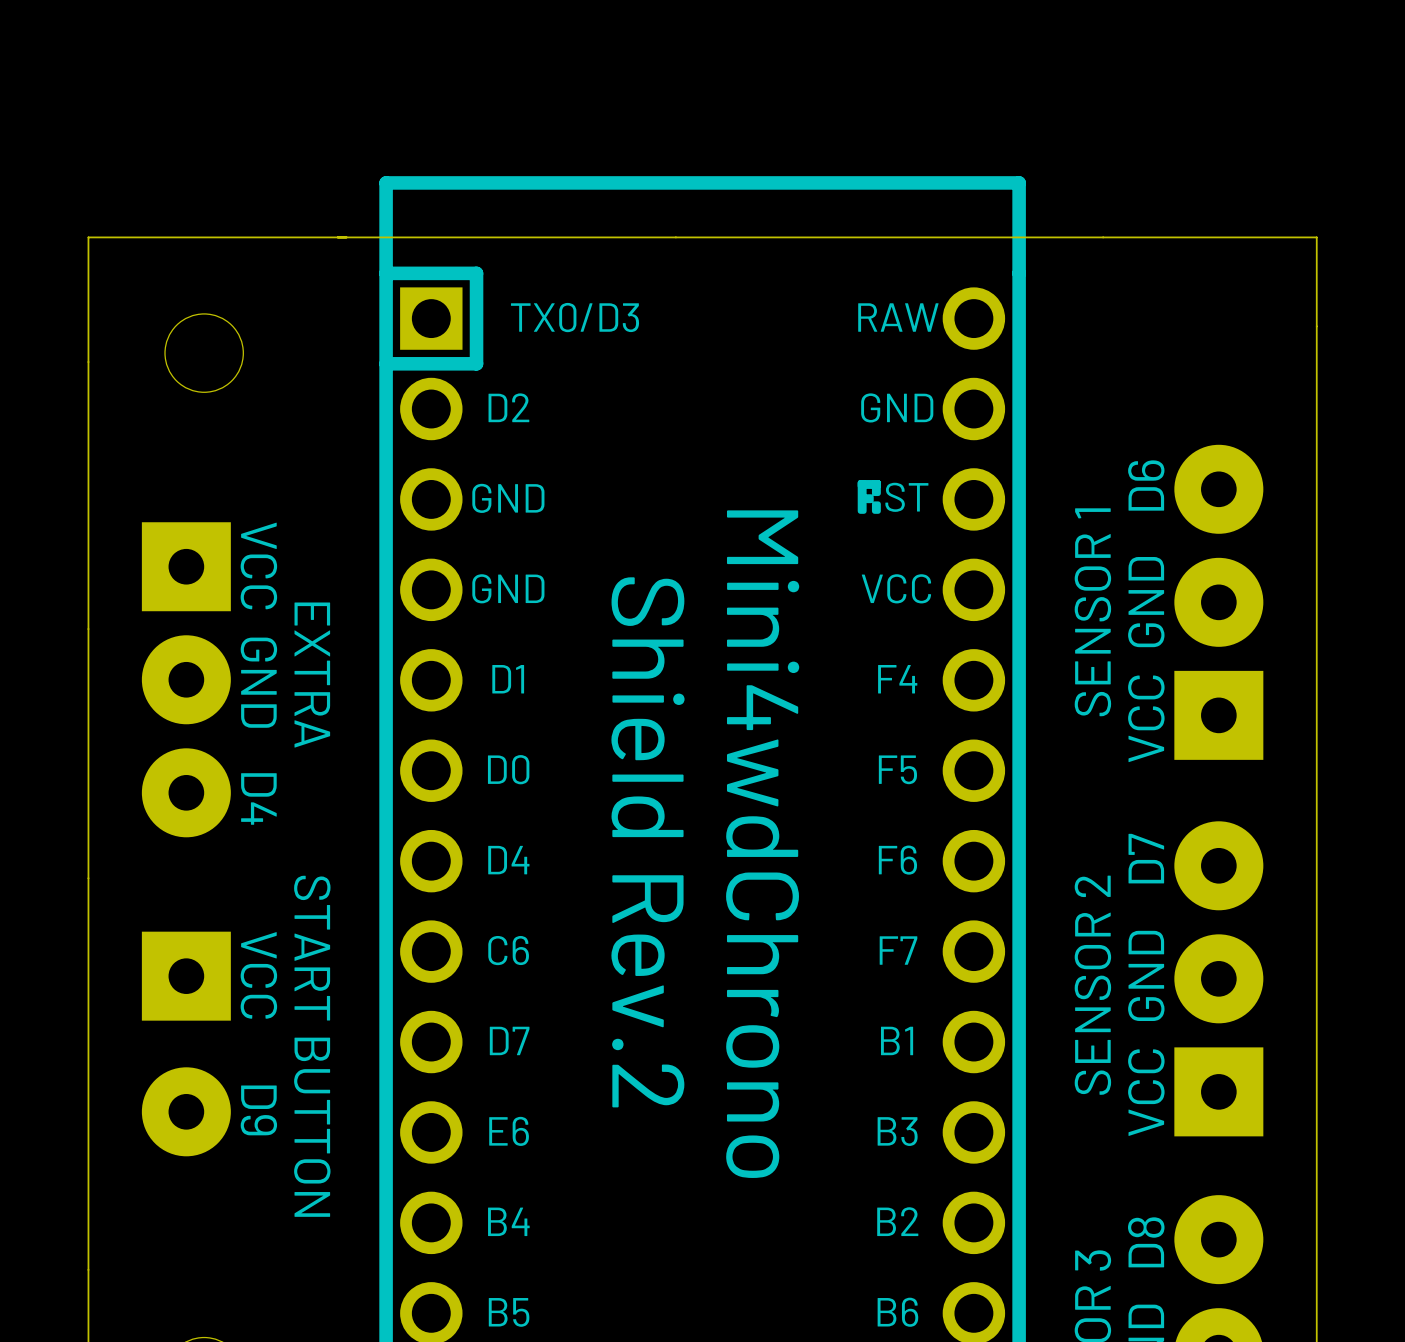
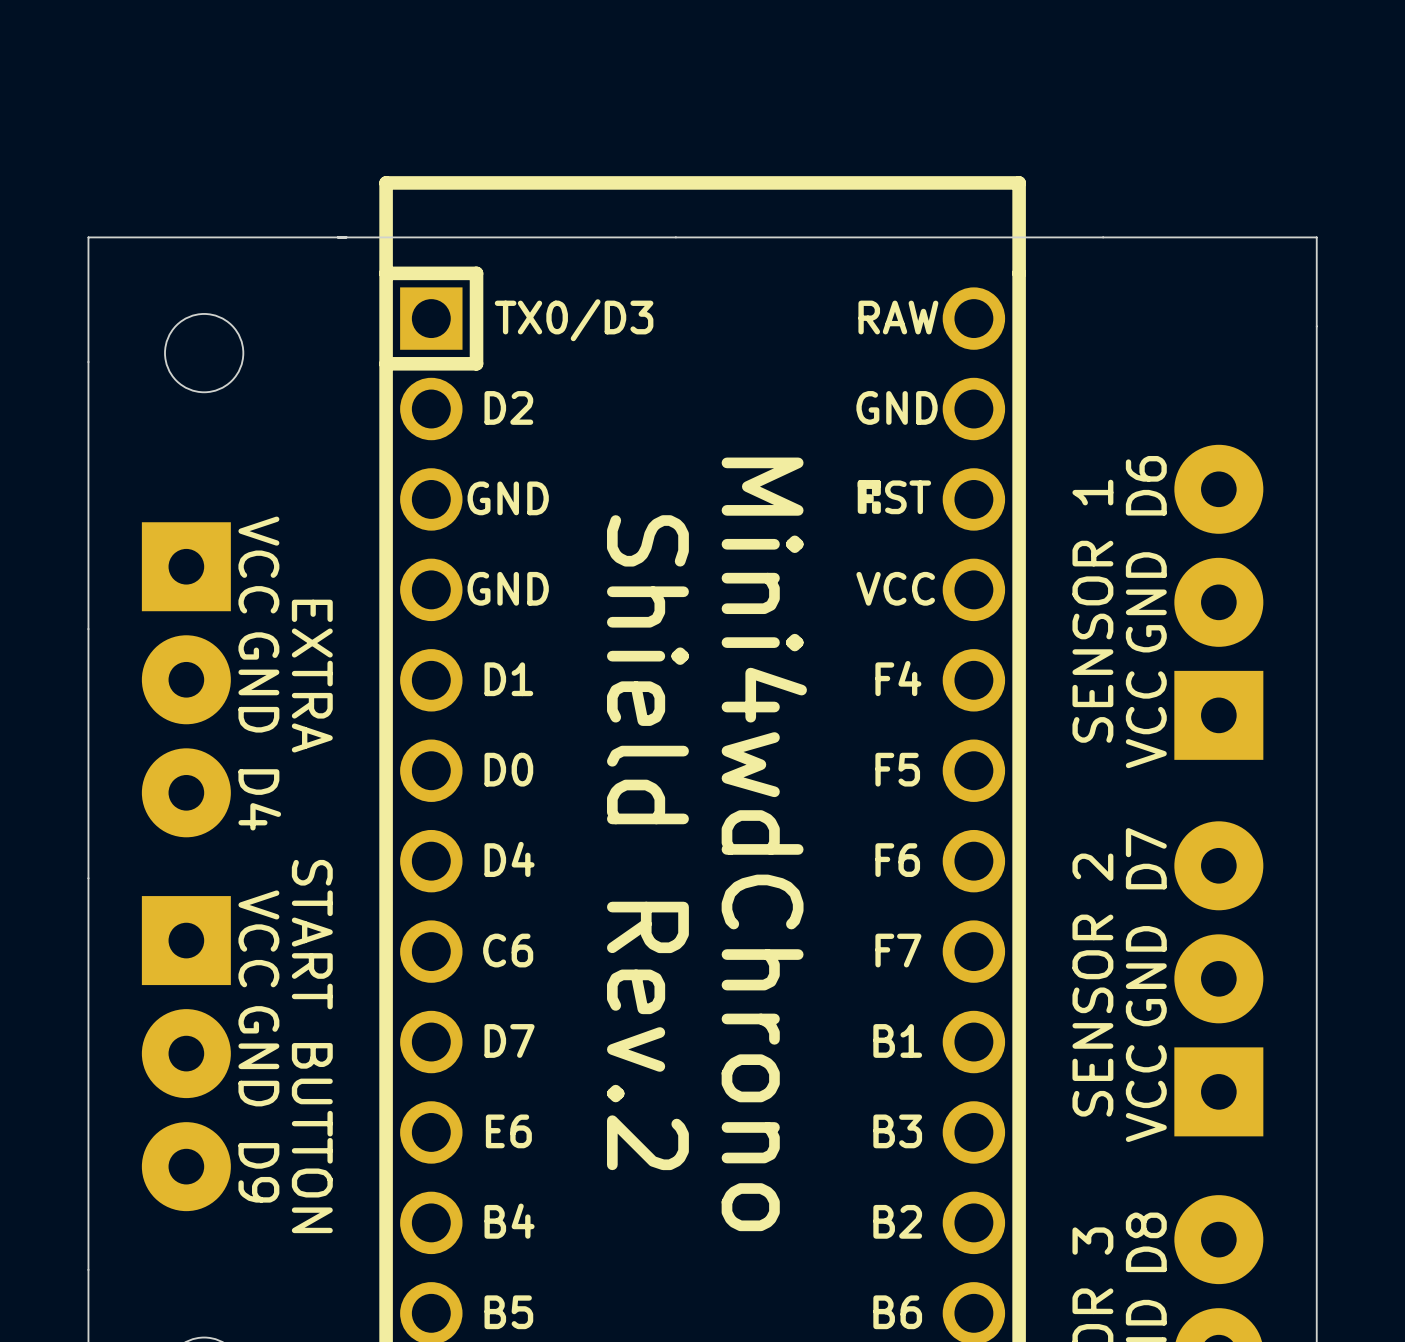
part footprint: [141, 931, 231, 1157] -> [141, 896, 231, 1212]
text position: VCC (258, 975) -> VCC (258, 938)
text: none -> GND (258, 1056)
text position: D9 (258, 1110) -> D9 (258, 1172)

